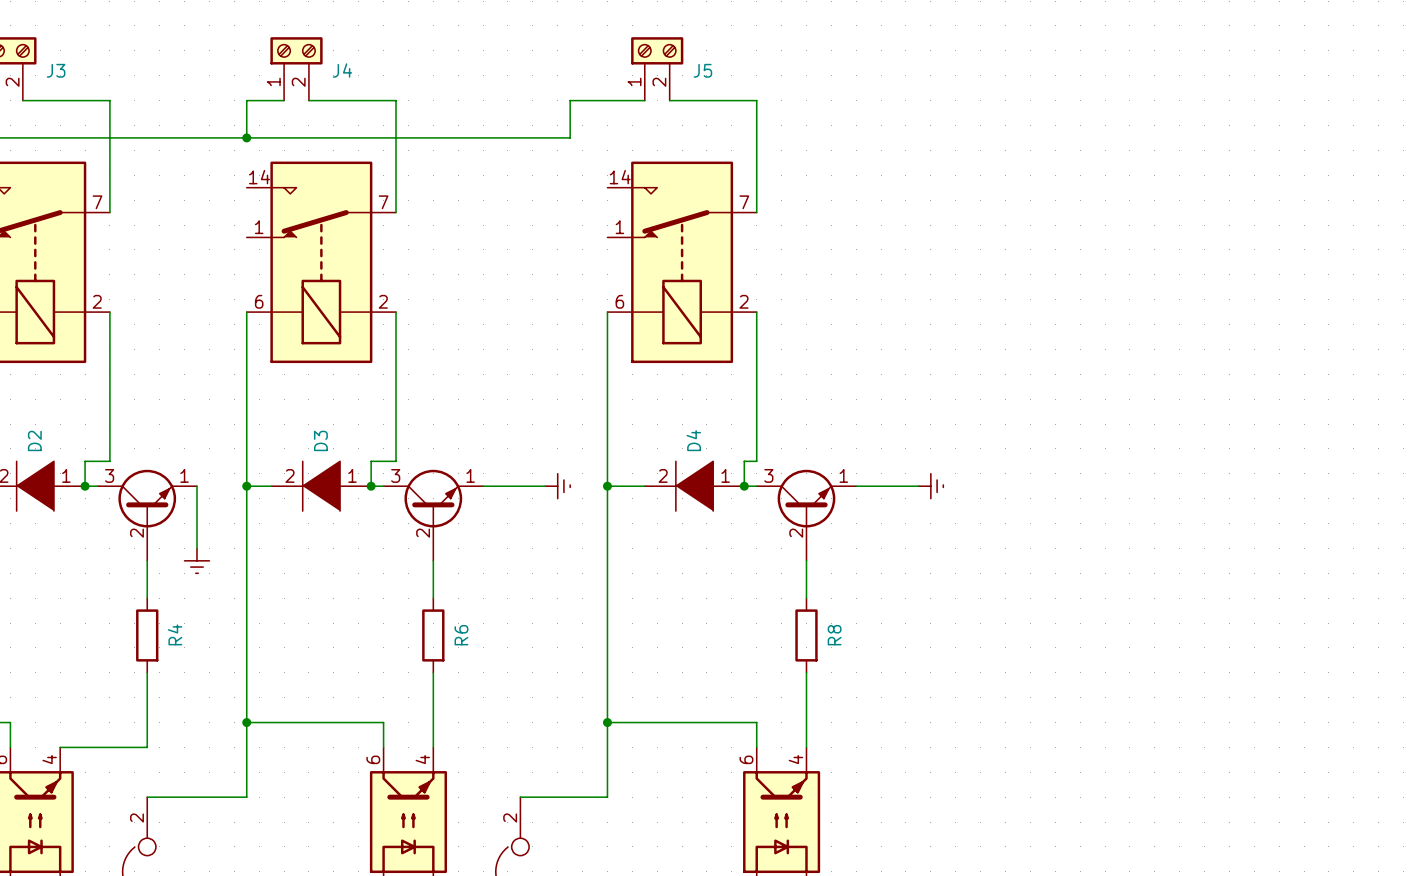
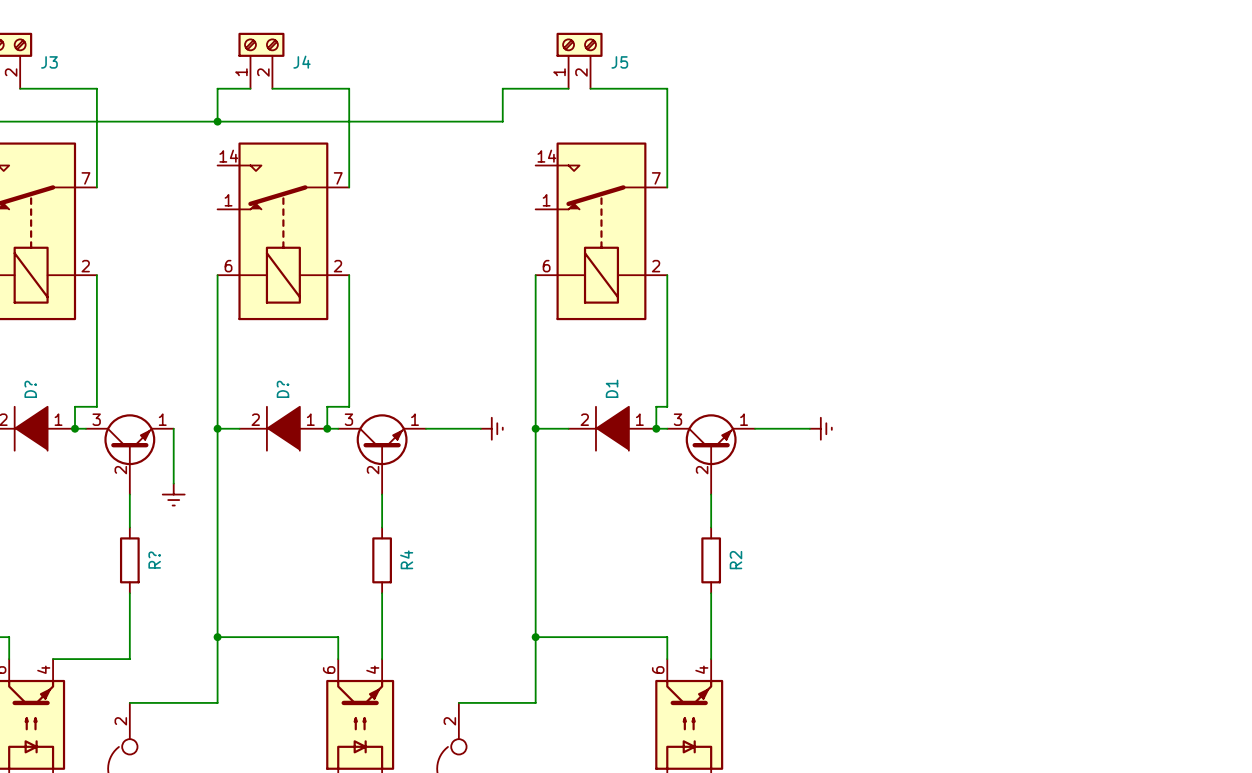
D2 name: D2 (34, 440) -> D? (30, 389)
D3 name: D3 (320, 440) -> D? (282, 389)
D4 name: D4 (693, 440) -> D1 (612, 388)
R4 name: R4 (175, 634) -> R? (154, 560)
R6 name: R6 (461, 635) -> R4 (406, 559)
R8 name: R8 (834, 635) -> R2 (735, 560)

